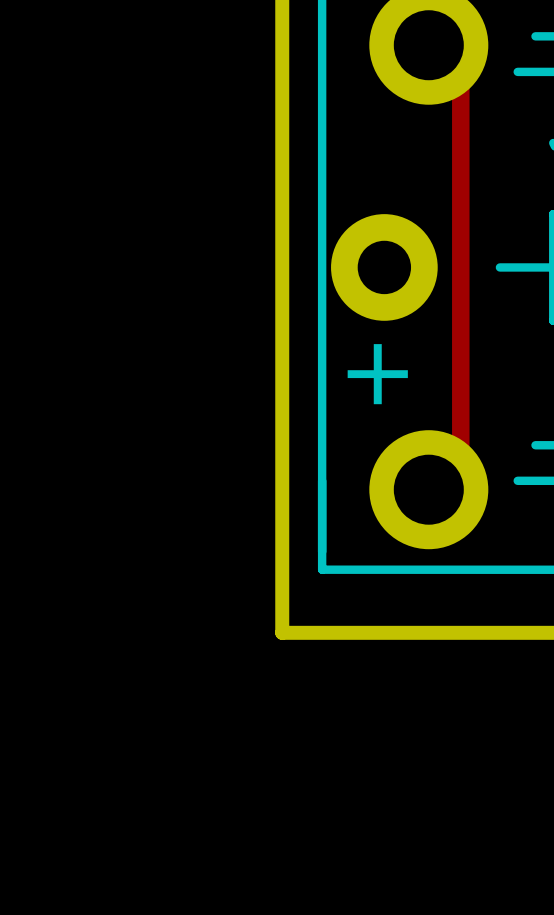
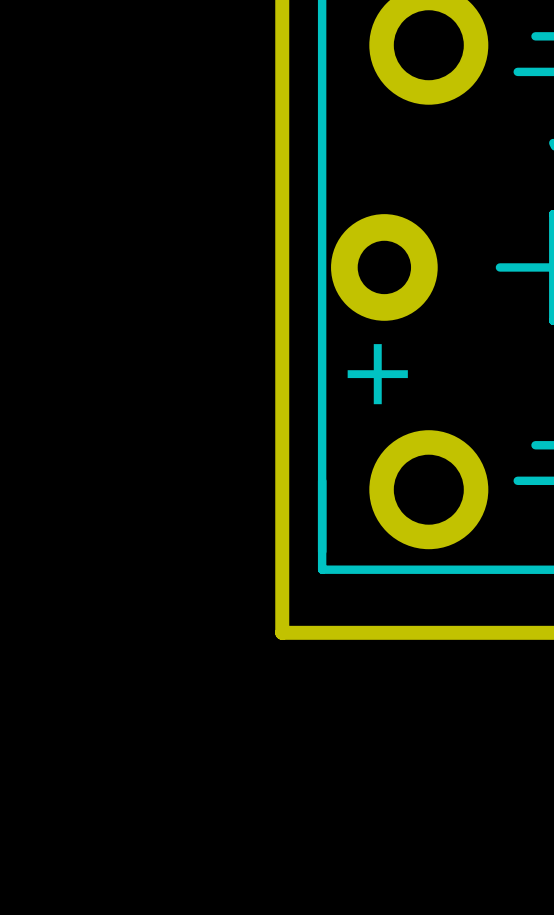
track: (428, 45) (460, 77) (460, 457) (428, 489) -> none

